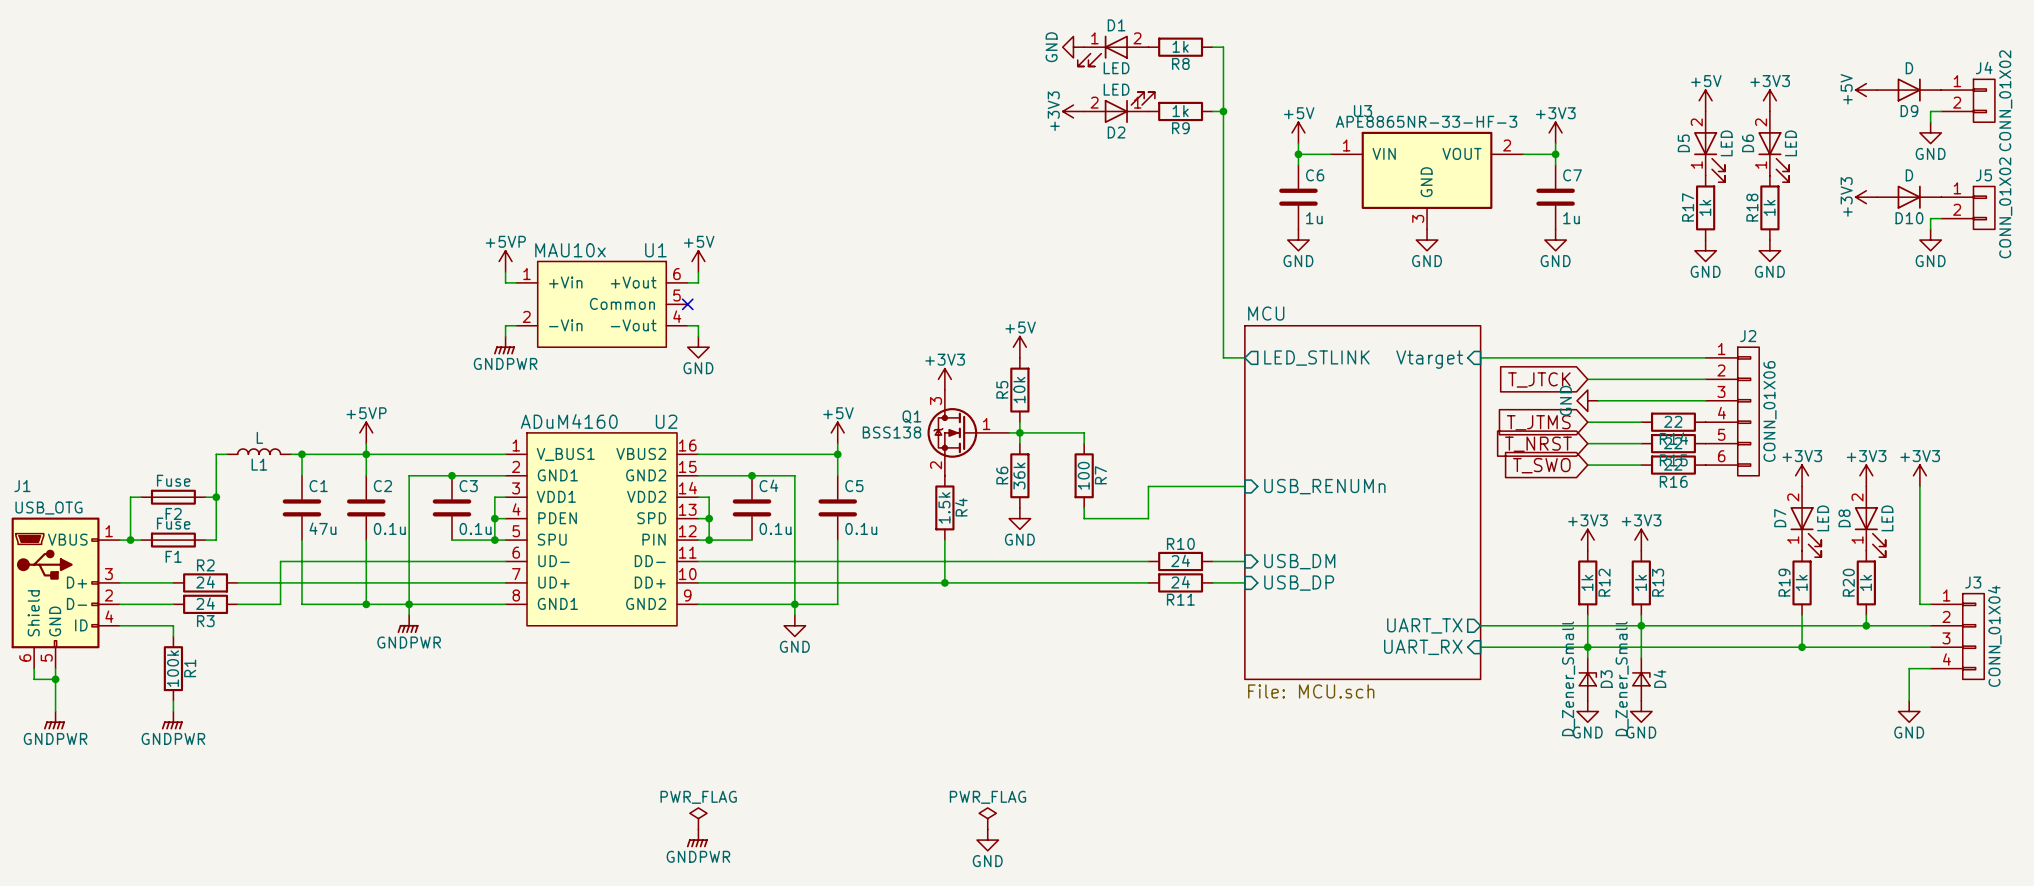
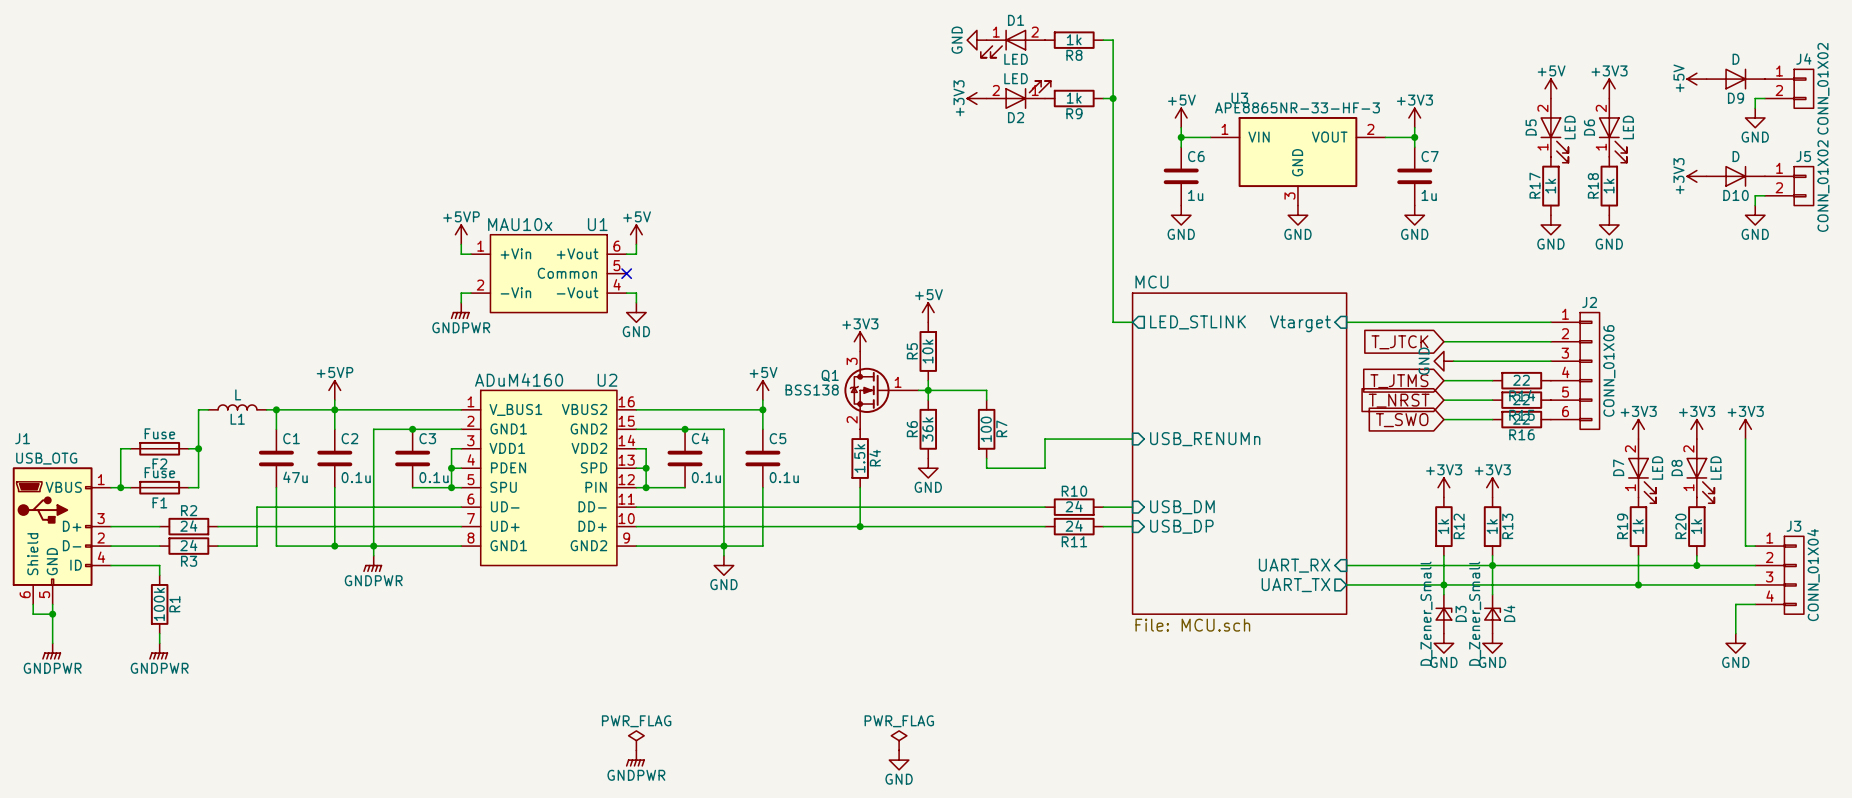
sheet pin shape: output (1424, 625) -> input (1294, 565)
sheet pin: UART_TX (1424, 625) -> UART_RX (1294, 565)
sheet pin shape: input (1423, 647) -> output (1295, 585)
sheet pin: UART_RX (1423, 647) -> UART_TX (1295, 585)

